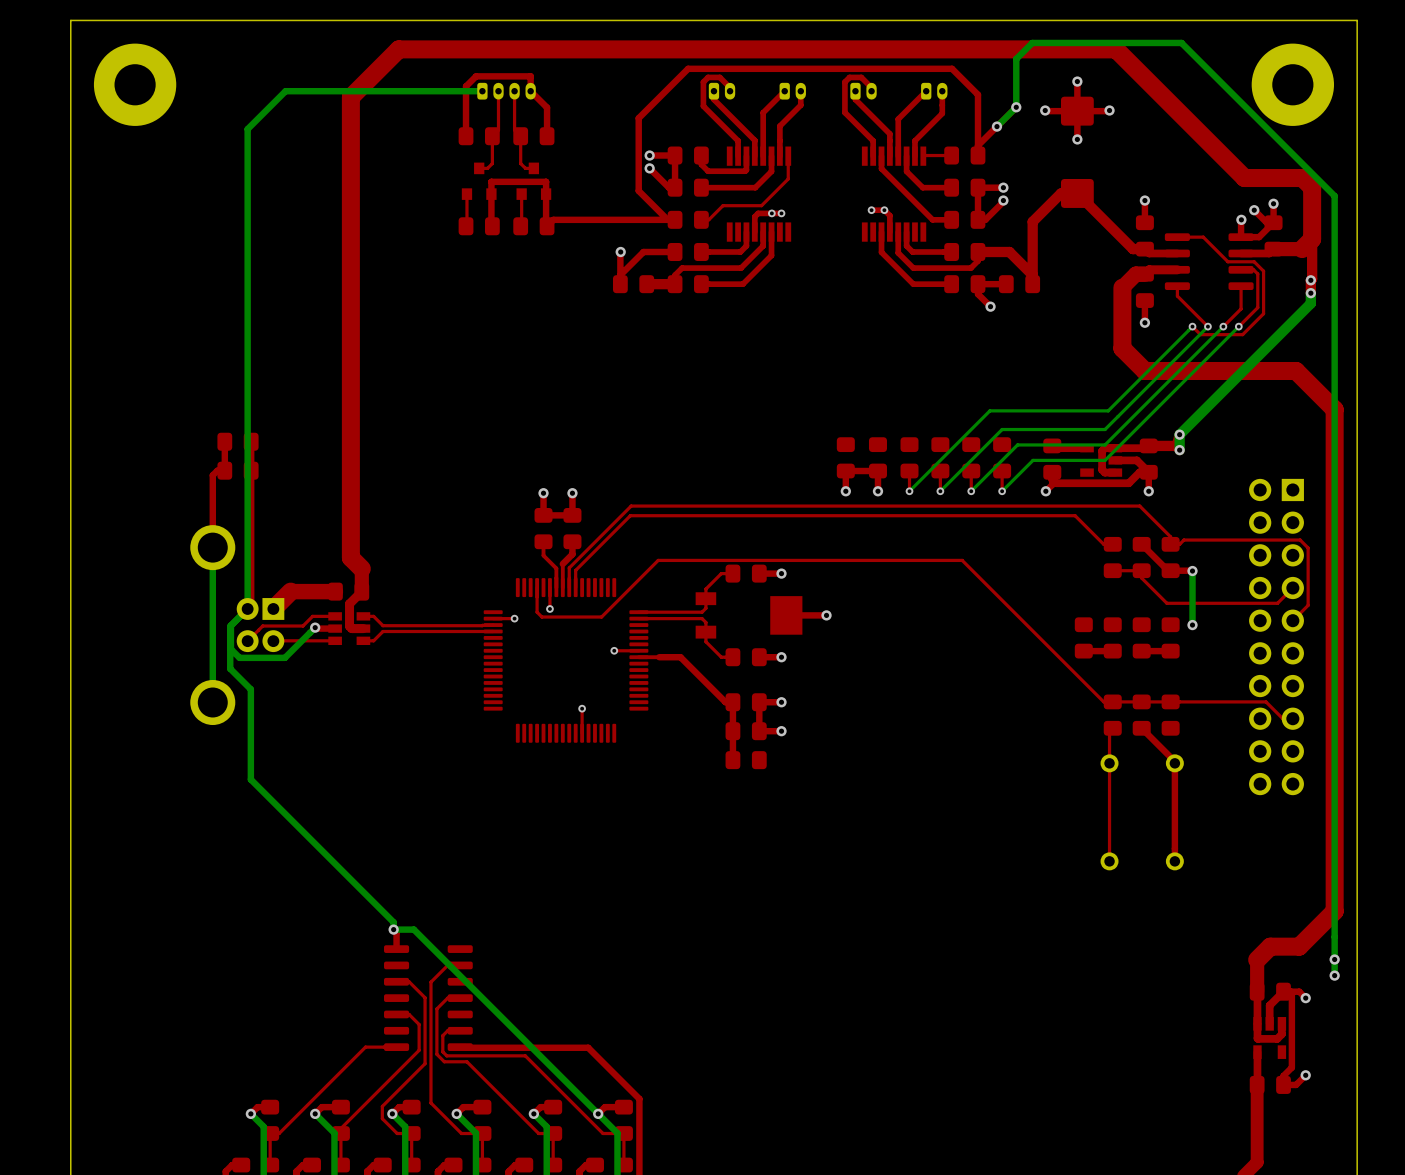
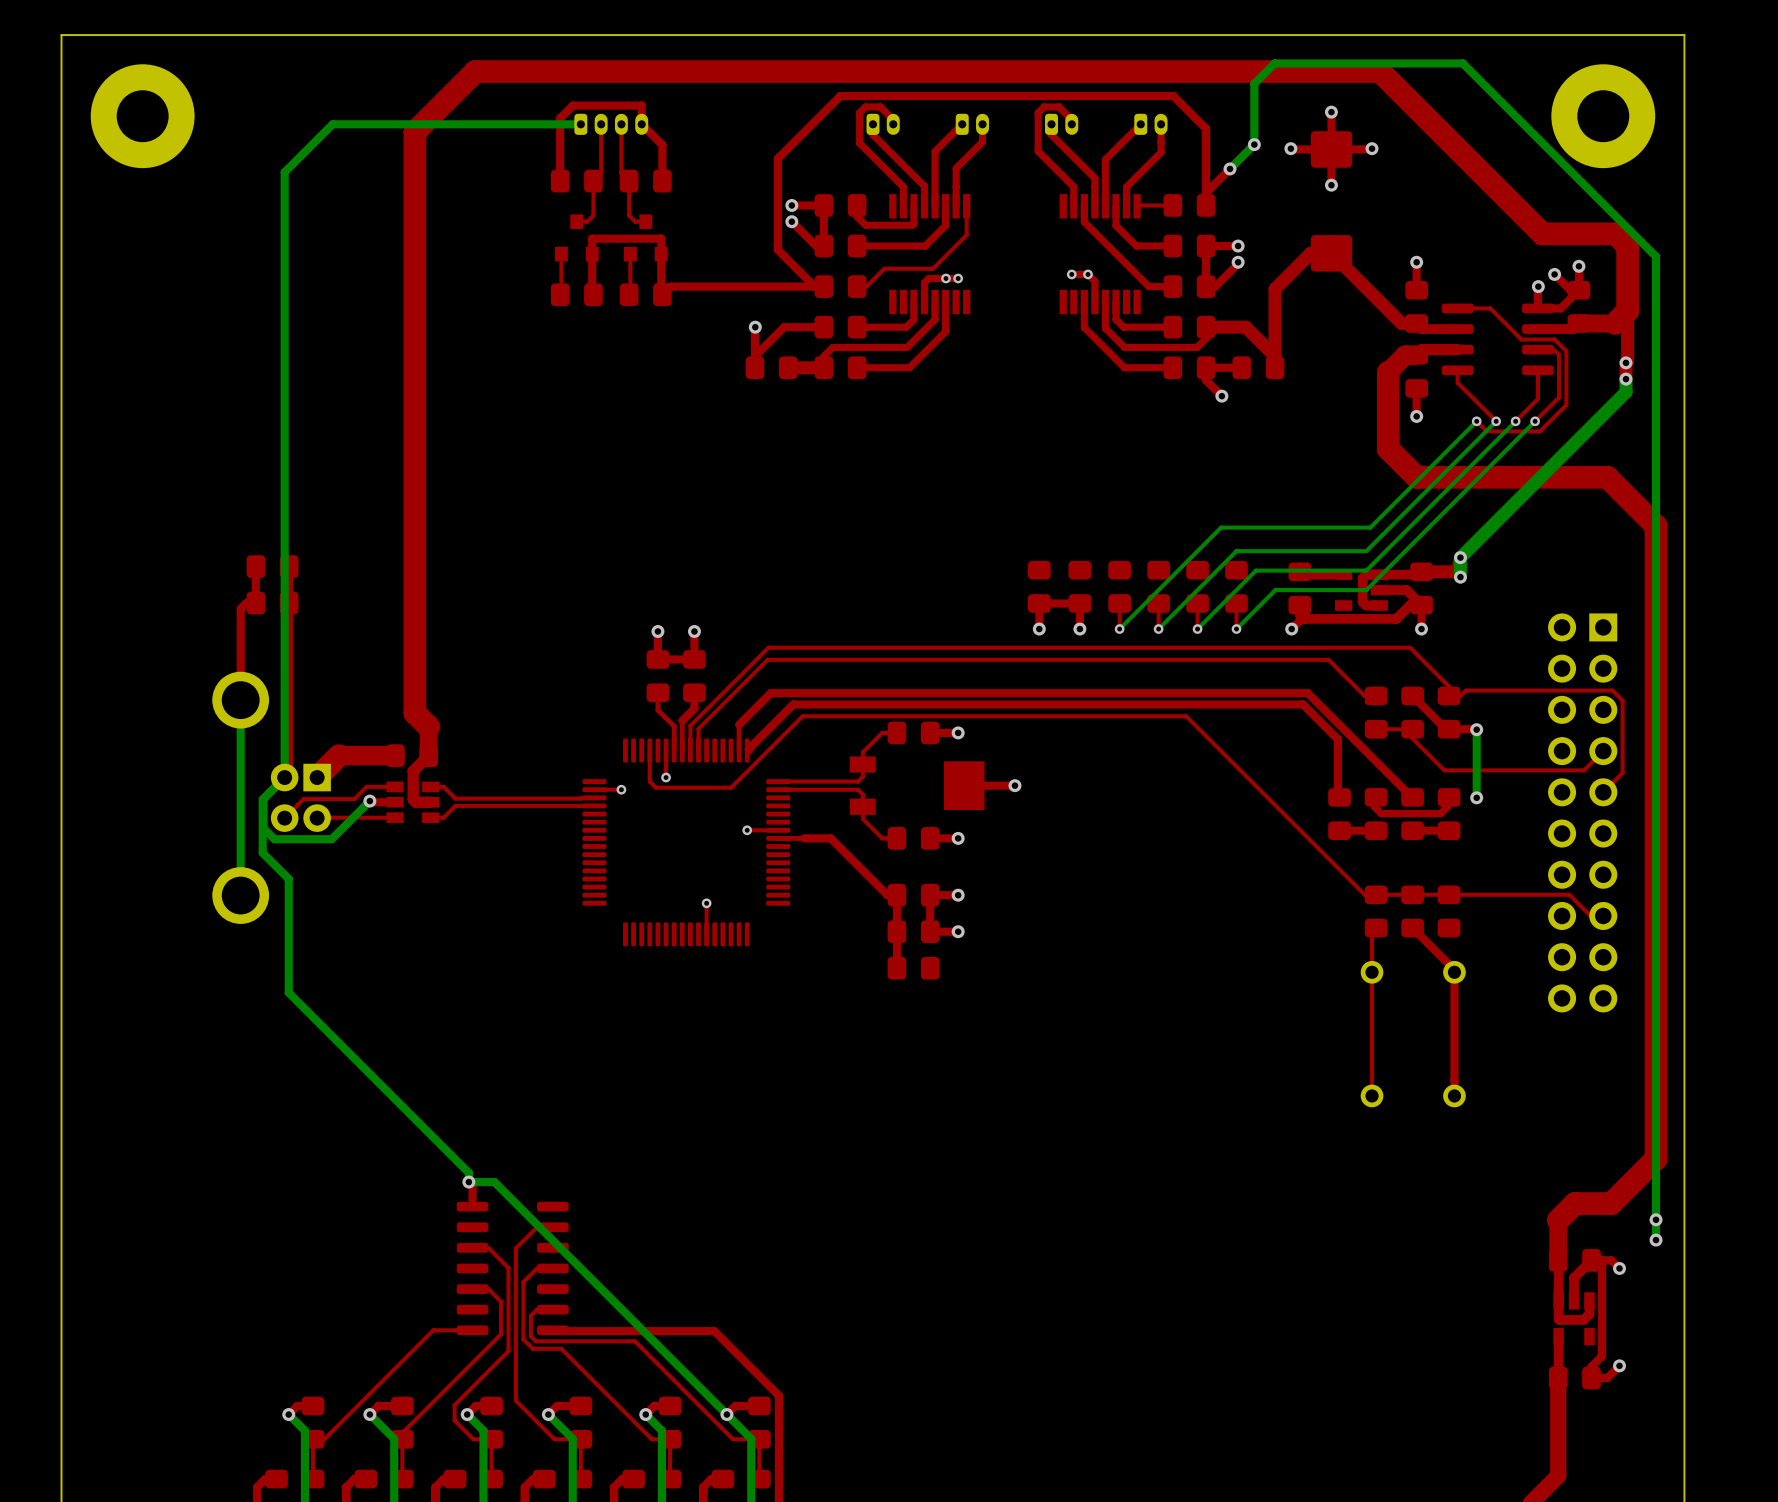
top track: none -> (739, 750) (739, 724) (770, 693) (1307, 693) (1410, 797)
top track: none -> (748, 750) (793, 704) (1303, 704) (1337, 739) (1337, 797)
top track: none -> (1447, 797) (1447, 806) (1440, 813) (1381, 813) (1374, 806) (1374, 797)

